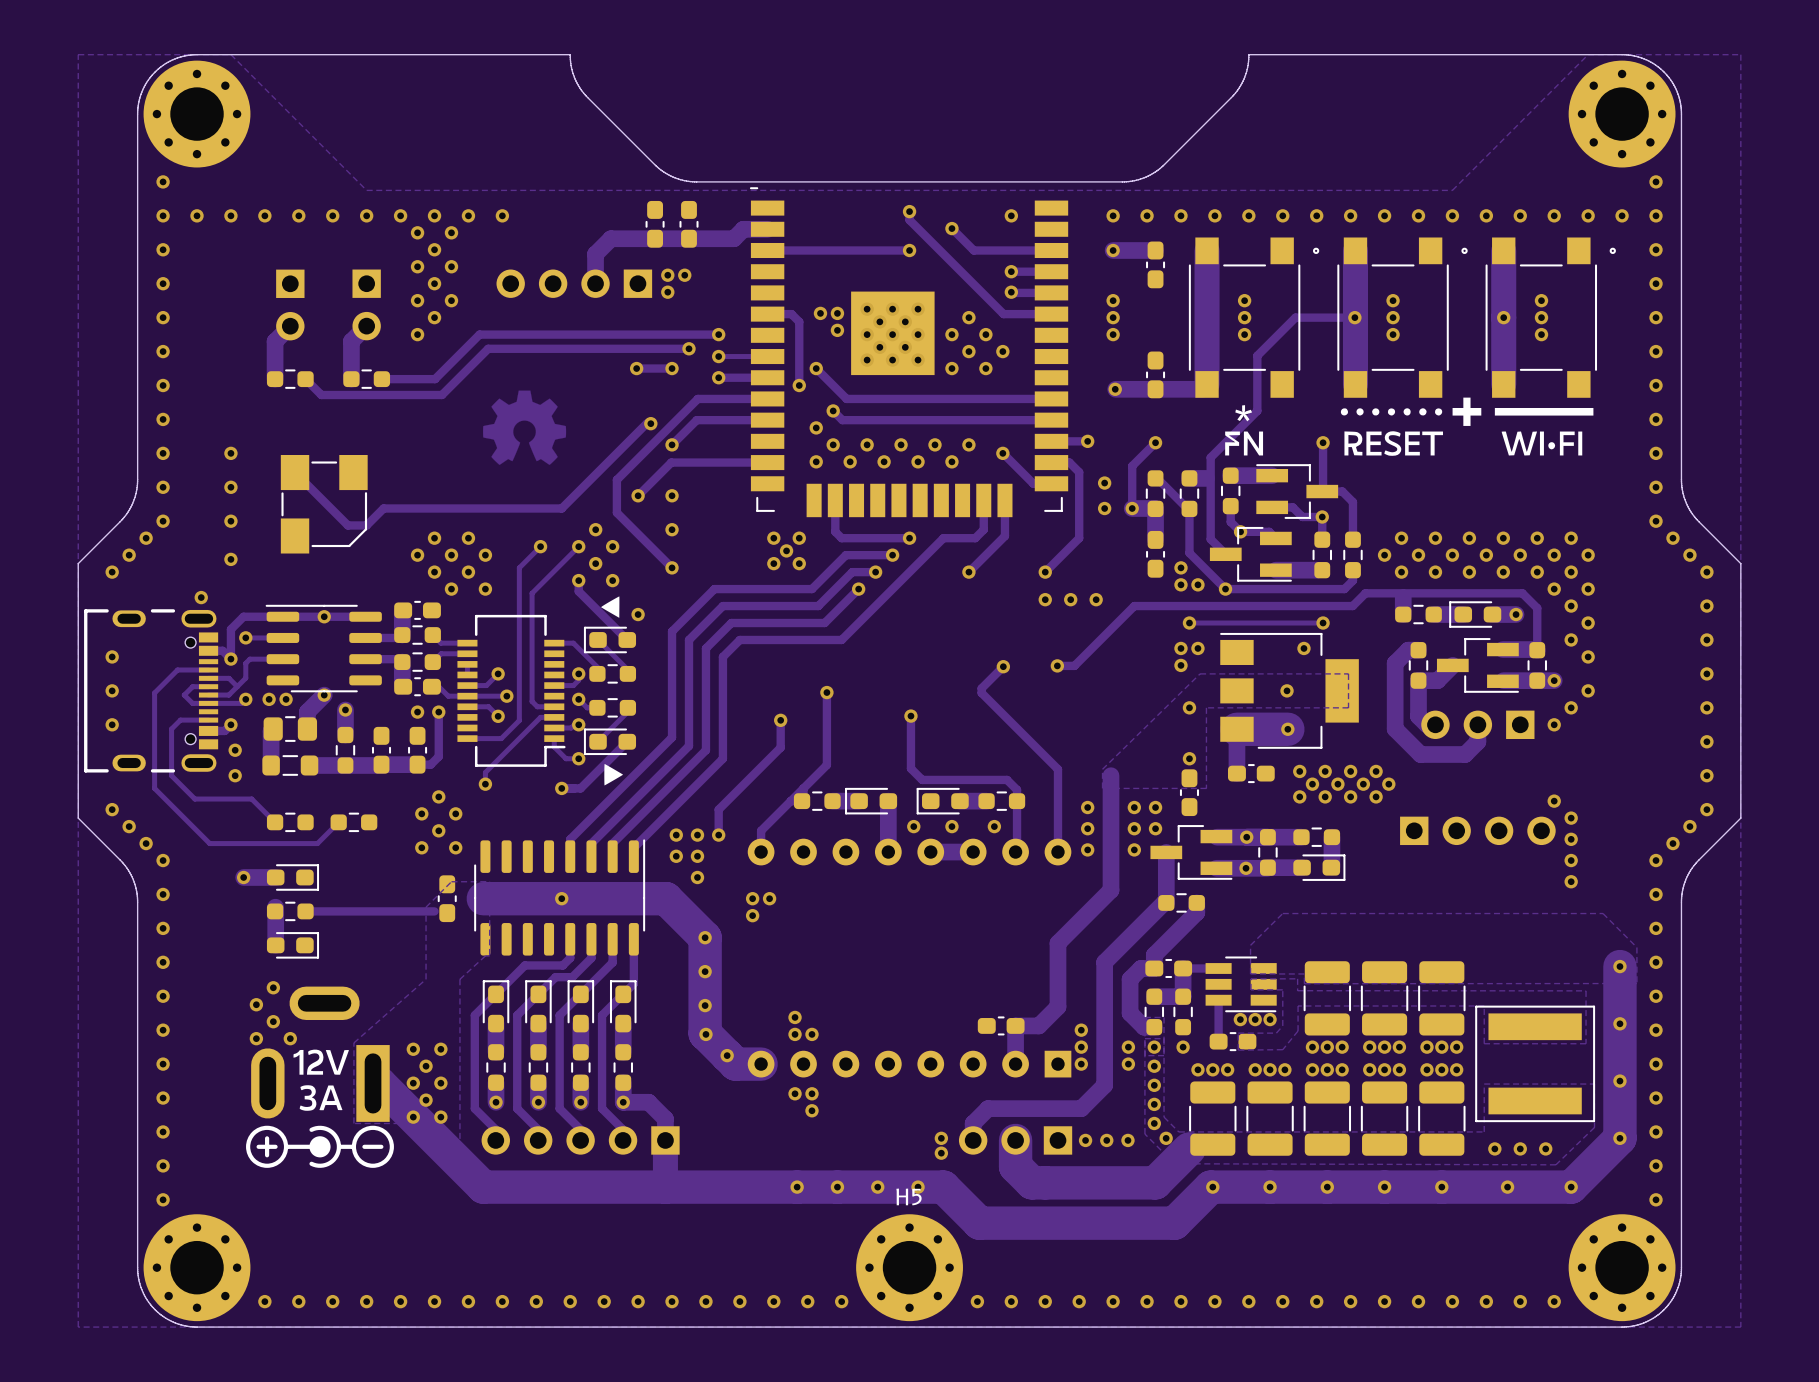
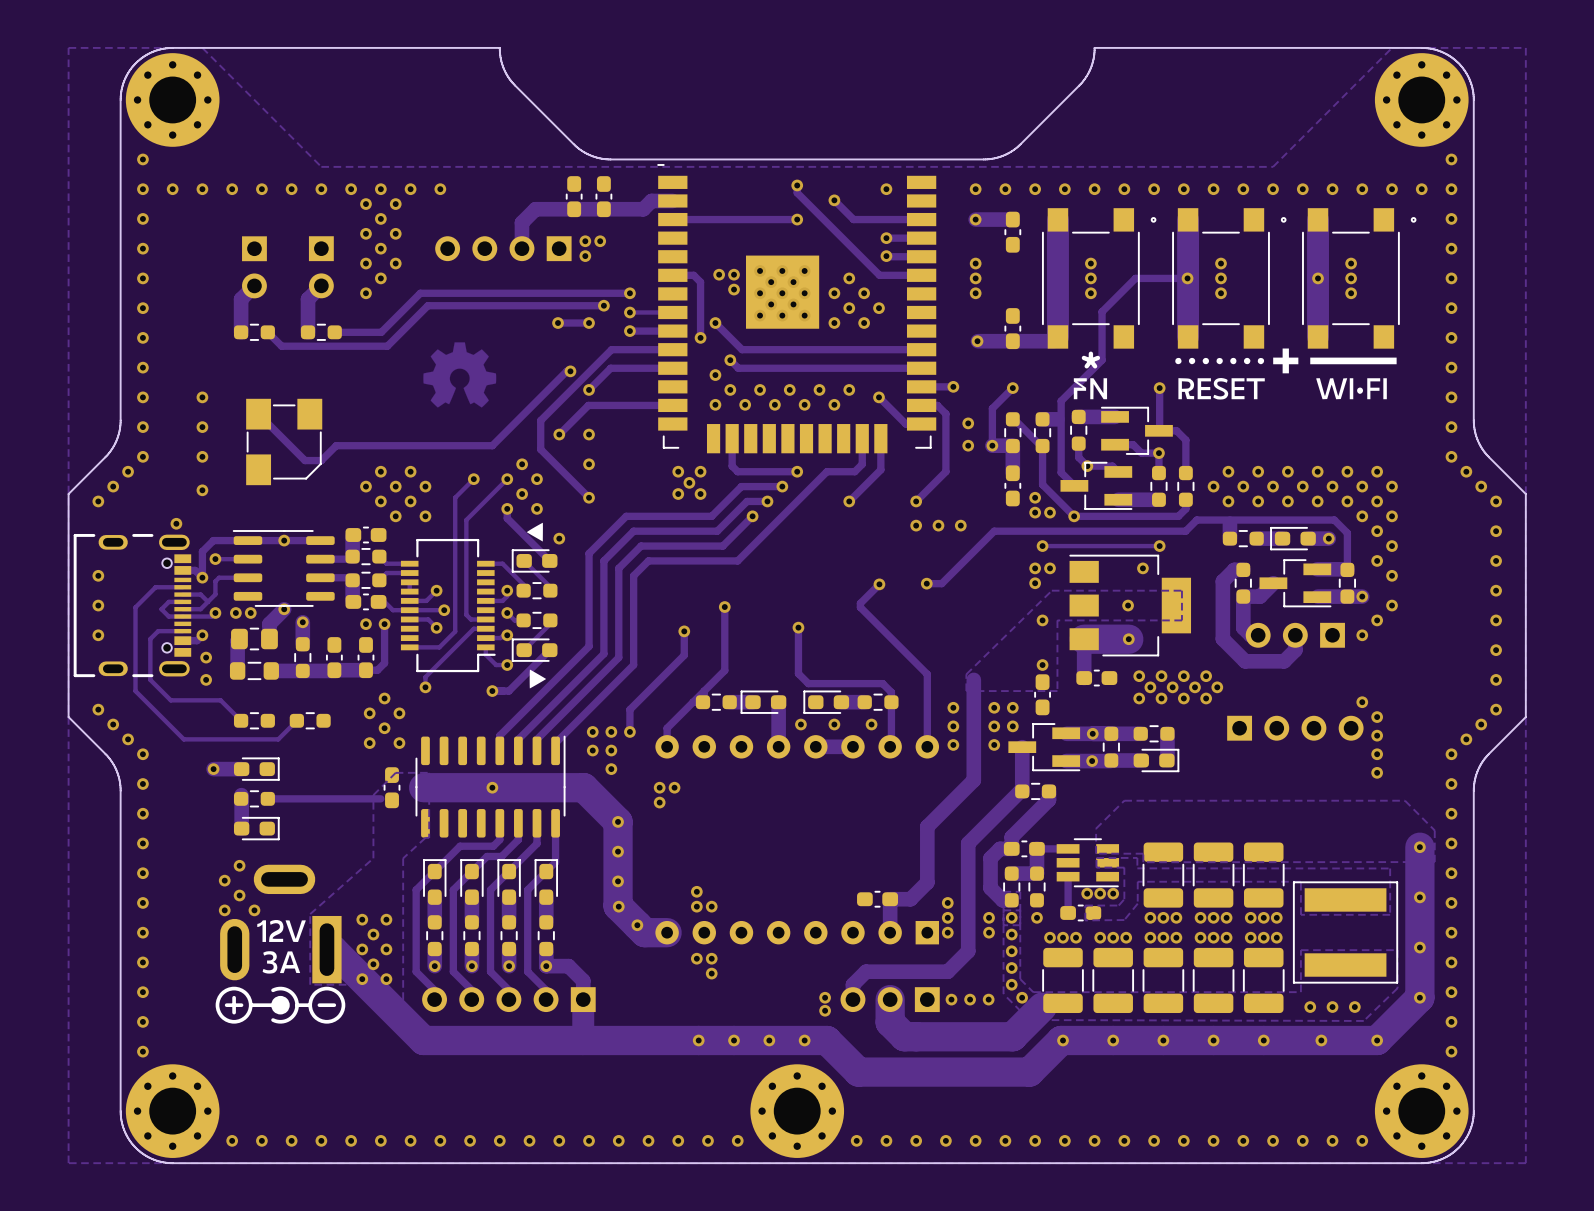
H5 name: H5 (908, 1196) -> none

